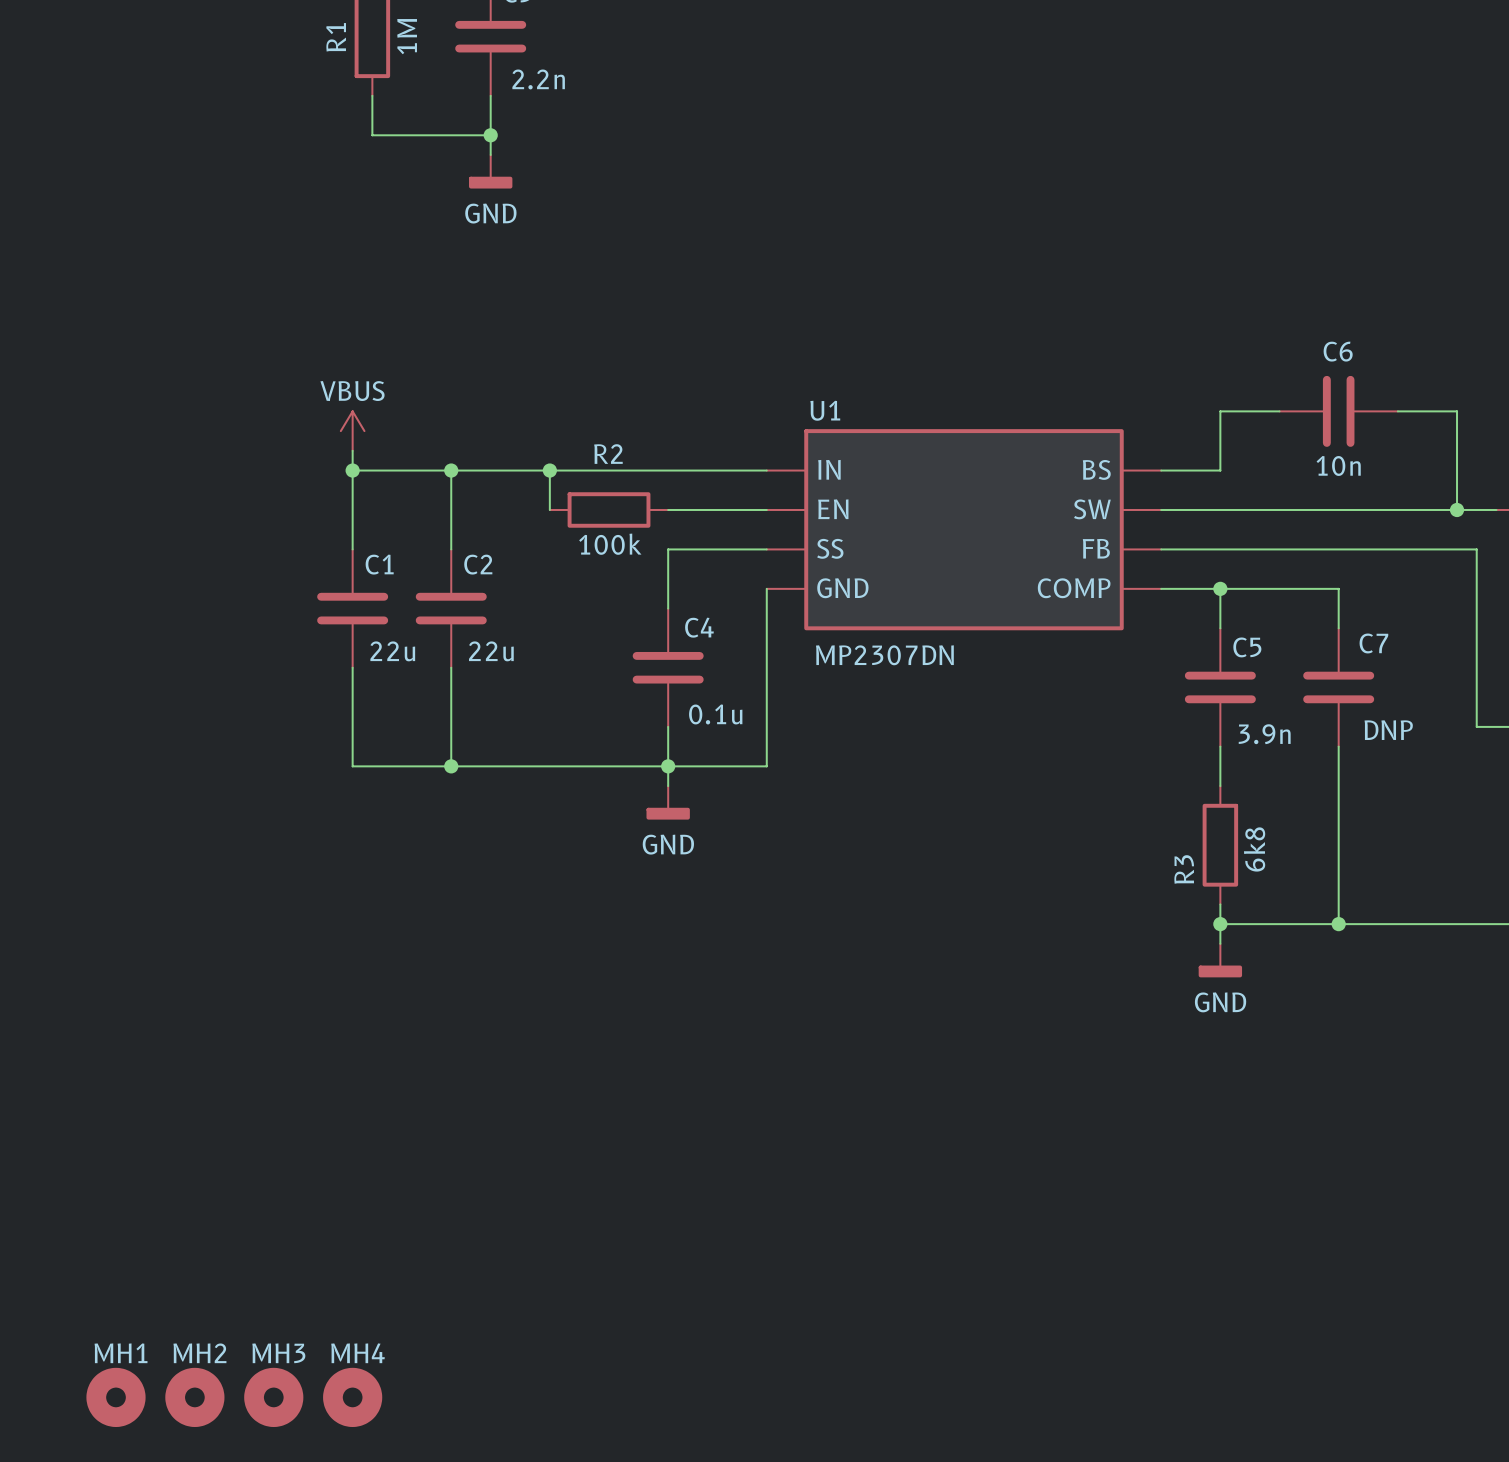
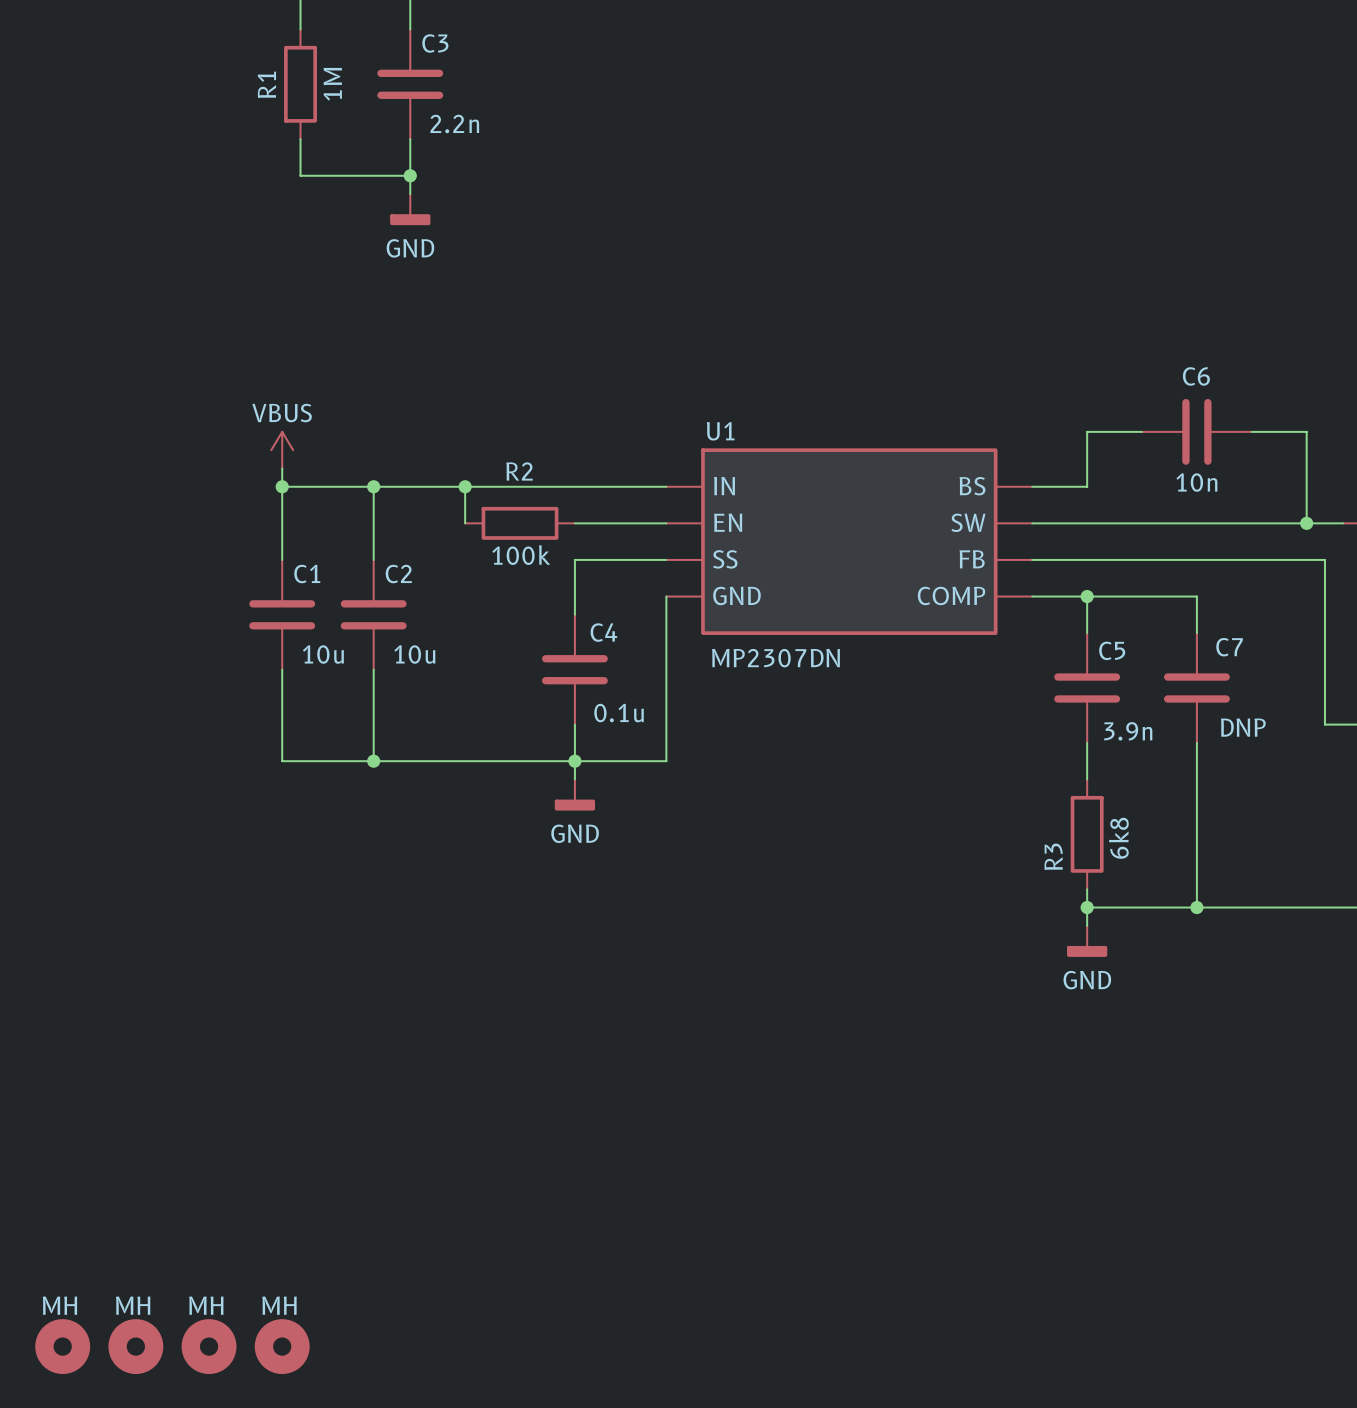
C1 value: 22u (392, 651) -> 10u (323, 654)
C2 value: 22u (491, 651) -> 10u (414, 654)
MH1 name: MH1 (121, 1353) -> MH (59, 1305)
MH2 name: MH2 (199, 1353) -> MH (133, 1305)
MH3 name: MH3 (278, 1353) -> MH (206, 1305)
MH4 name: MH4 (357, 1353) -> MH (279, 1305)

